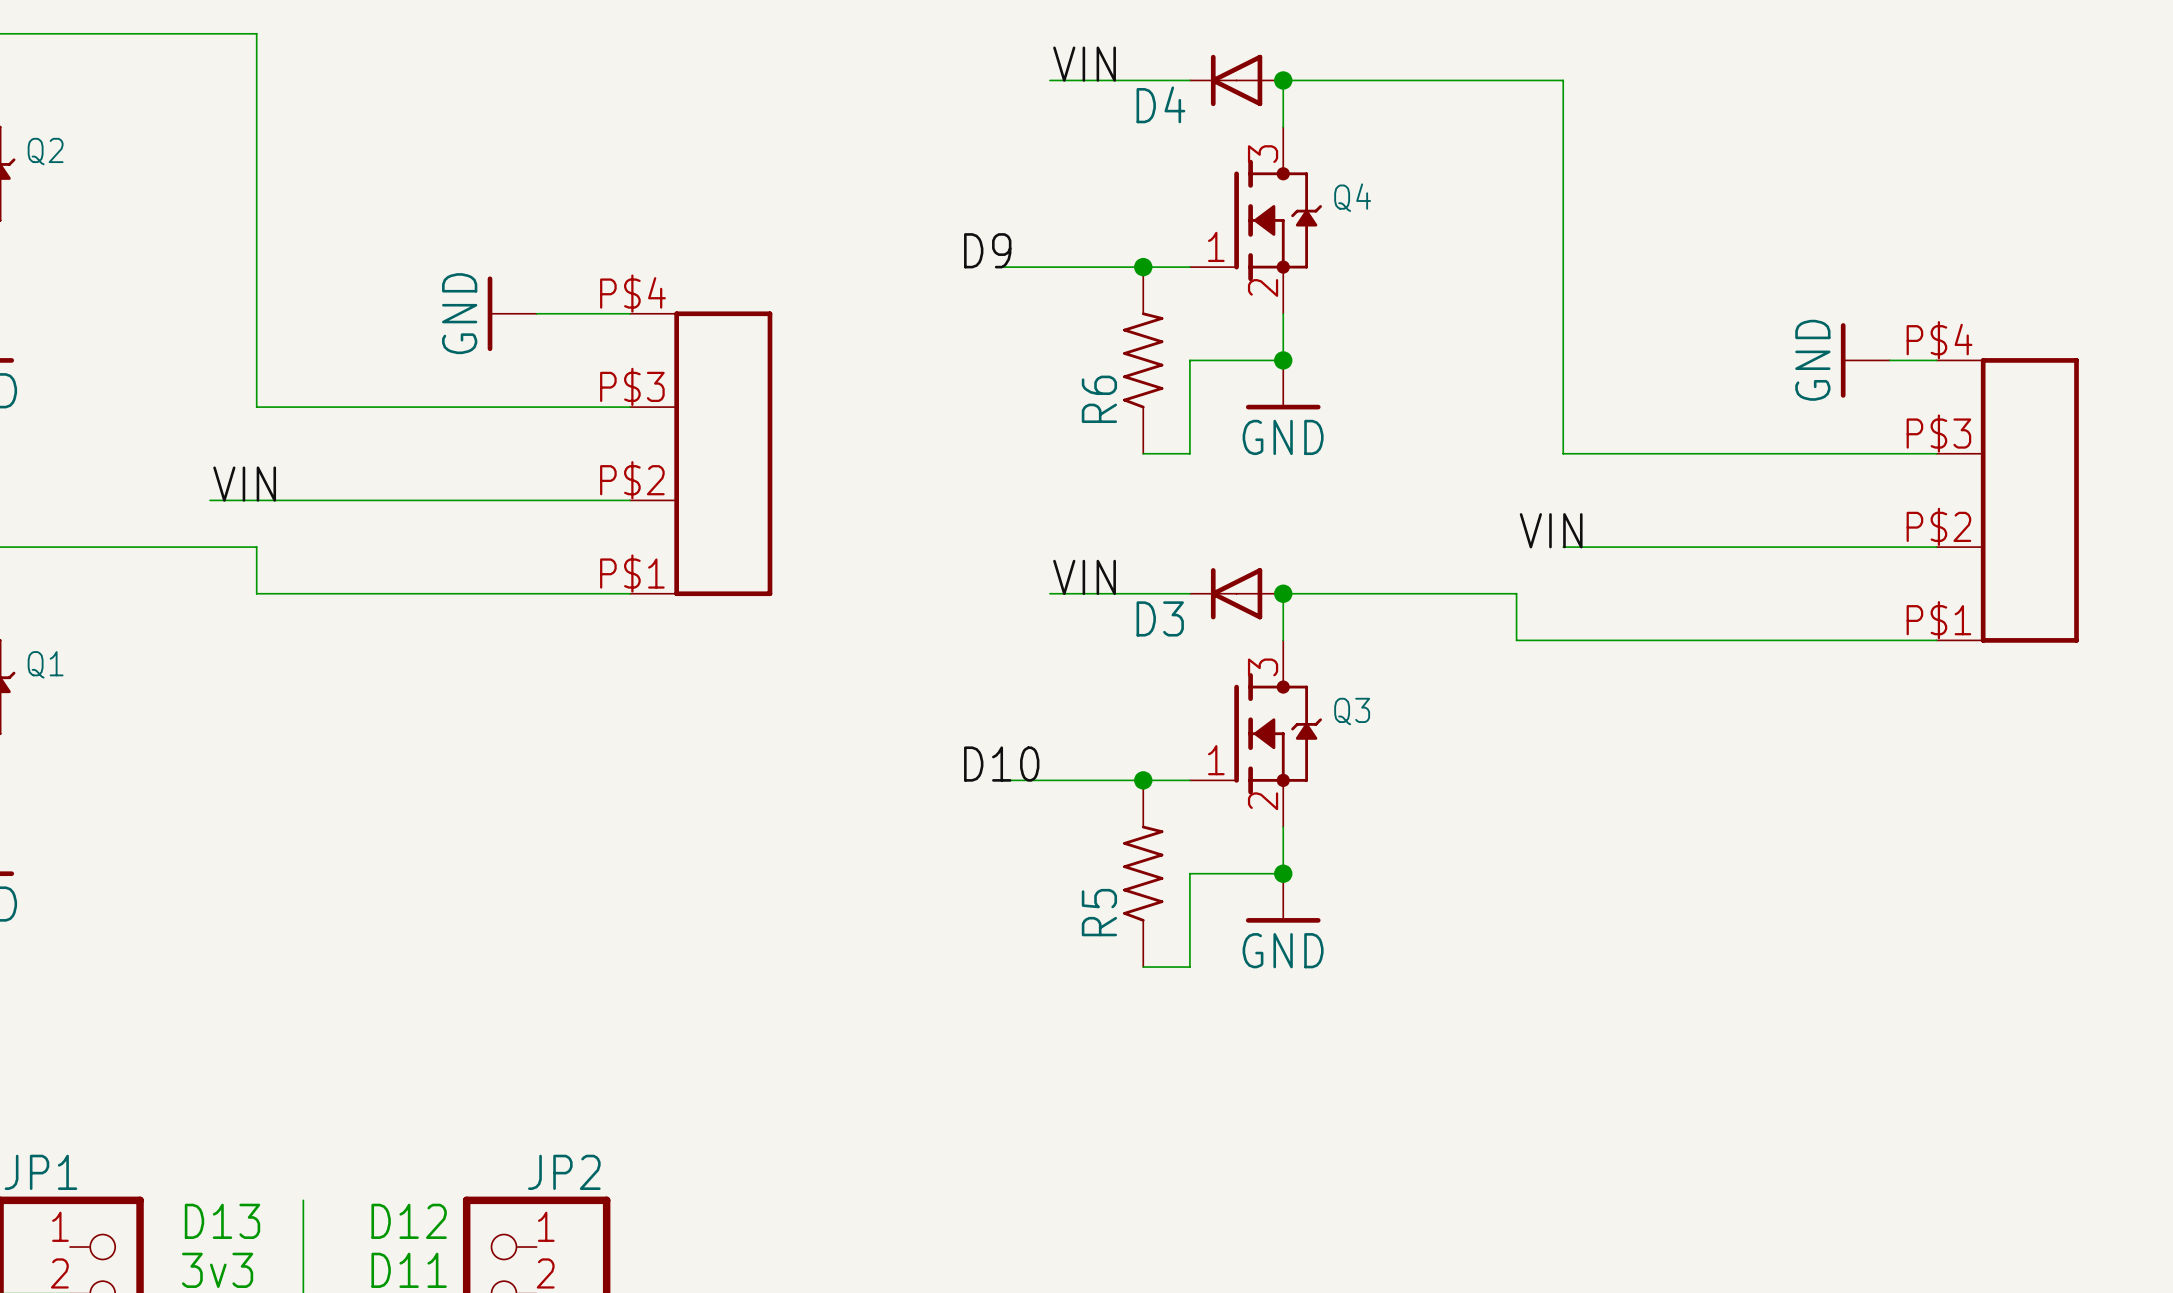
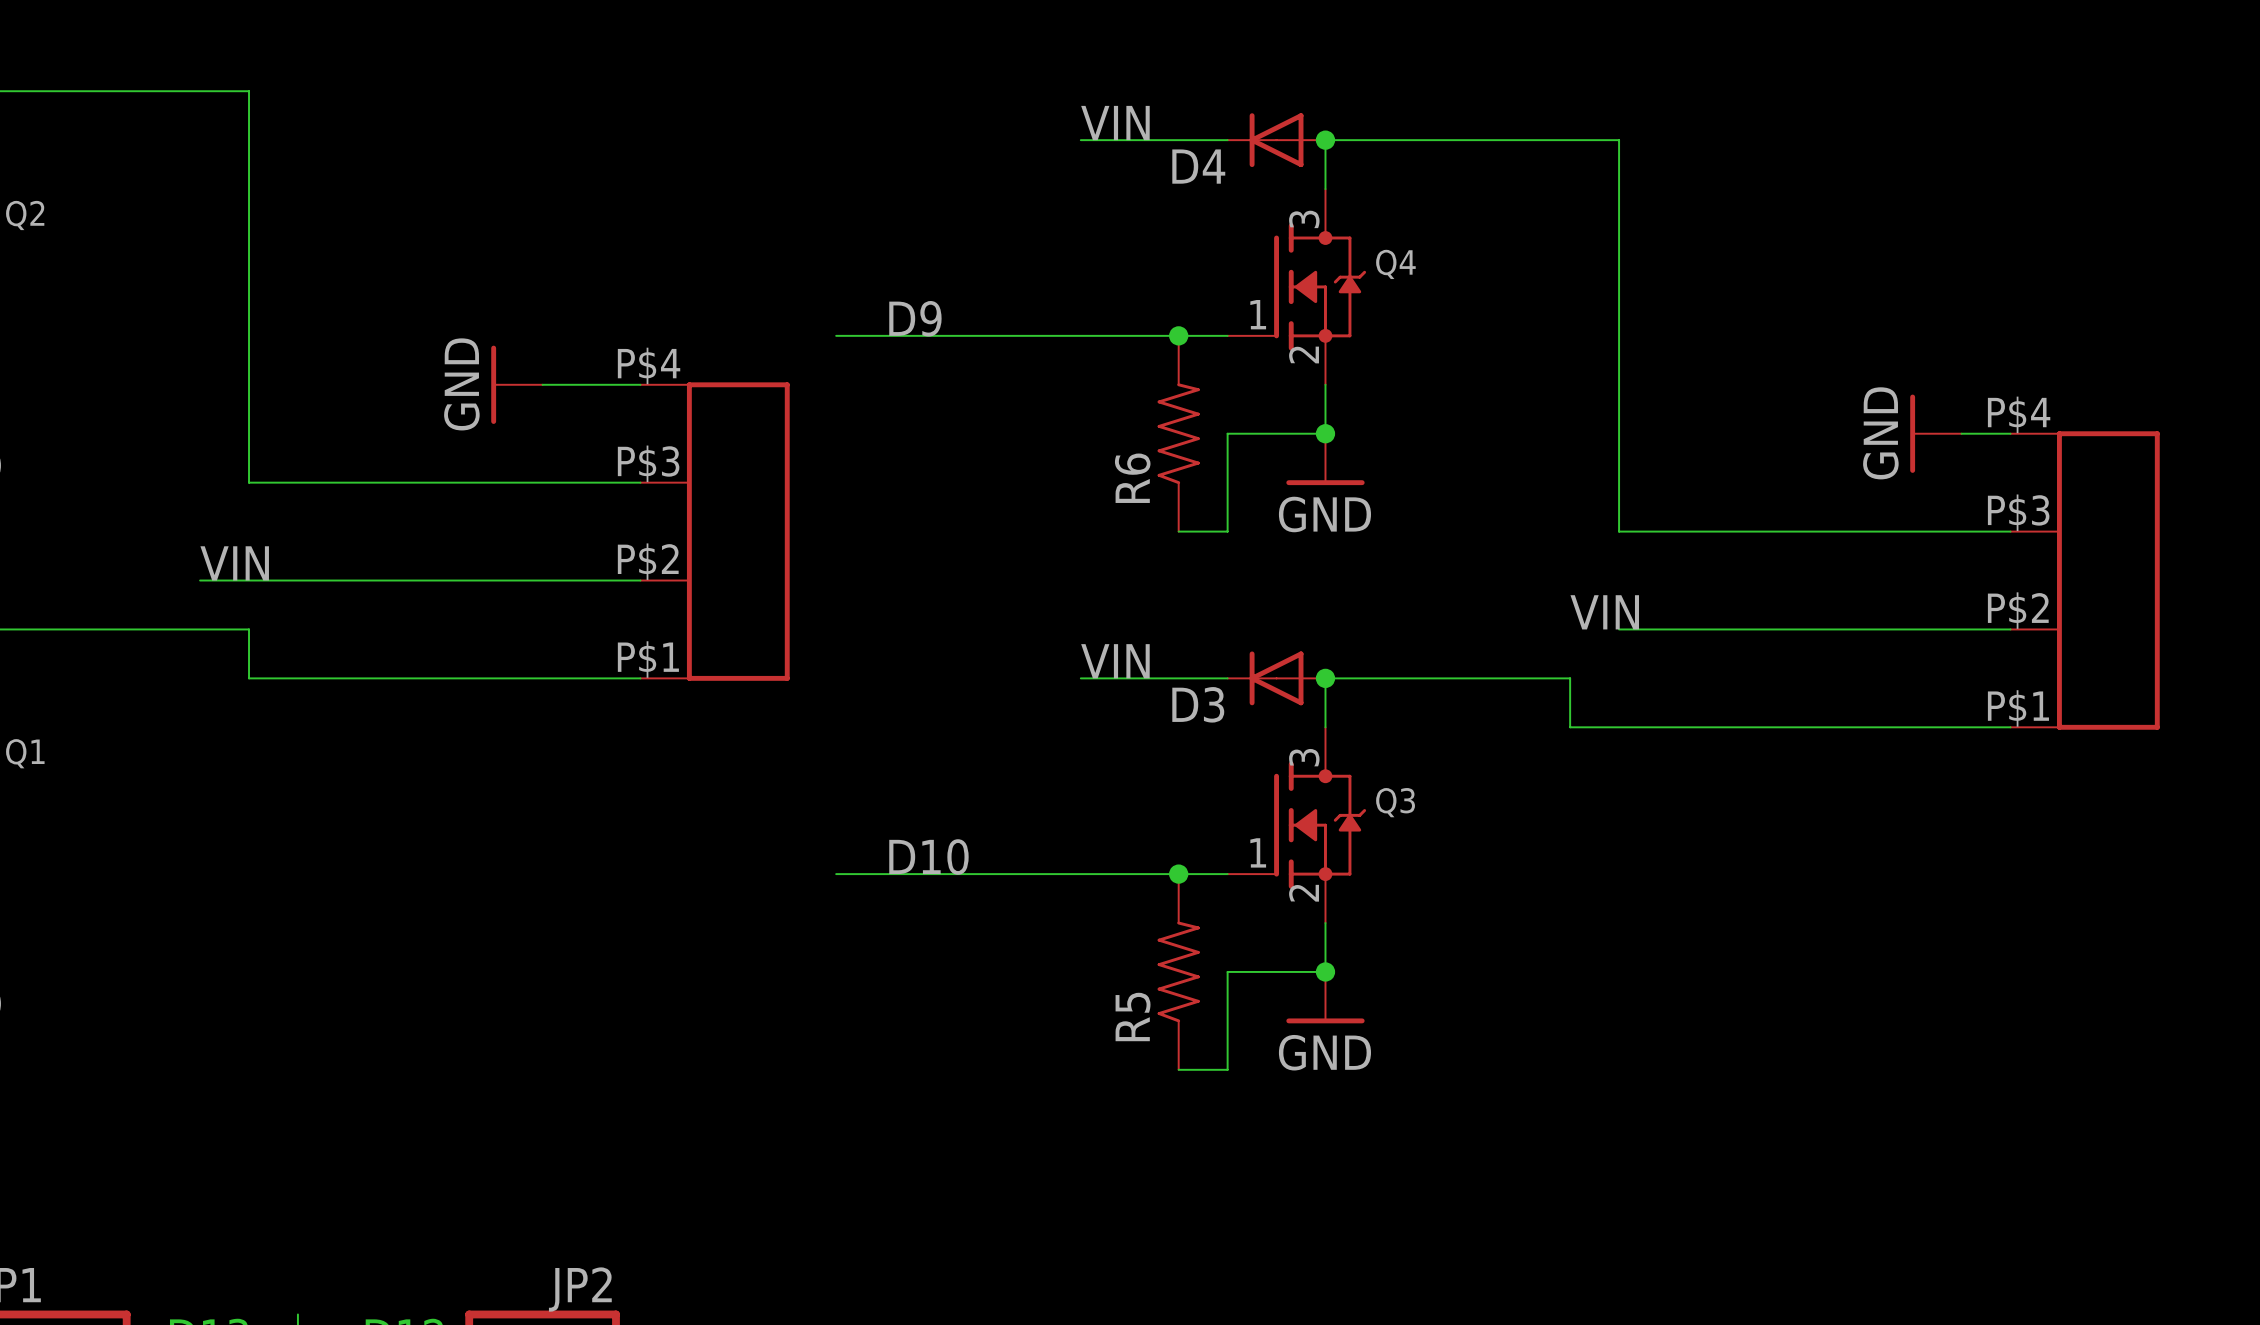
label position: D9 (987, 250) -> D9 (915, 318)
wire: none -> (836, 335) (1031, 335)
label position: D10 (1001, 764) -> D10 (928, 857)
wire: none -> (836, 874) (1031, 874)

